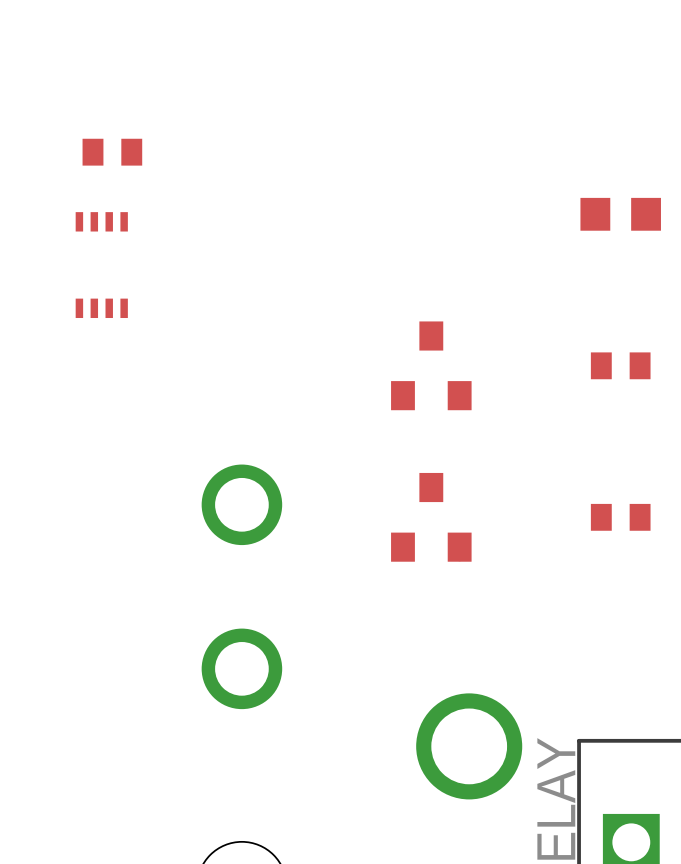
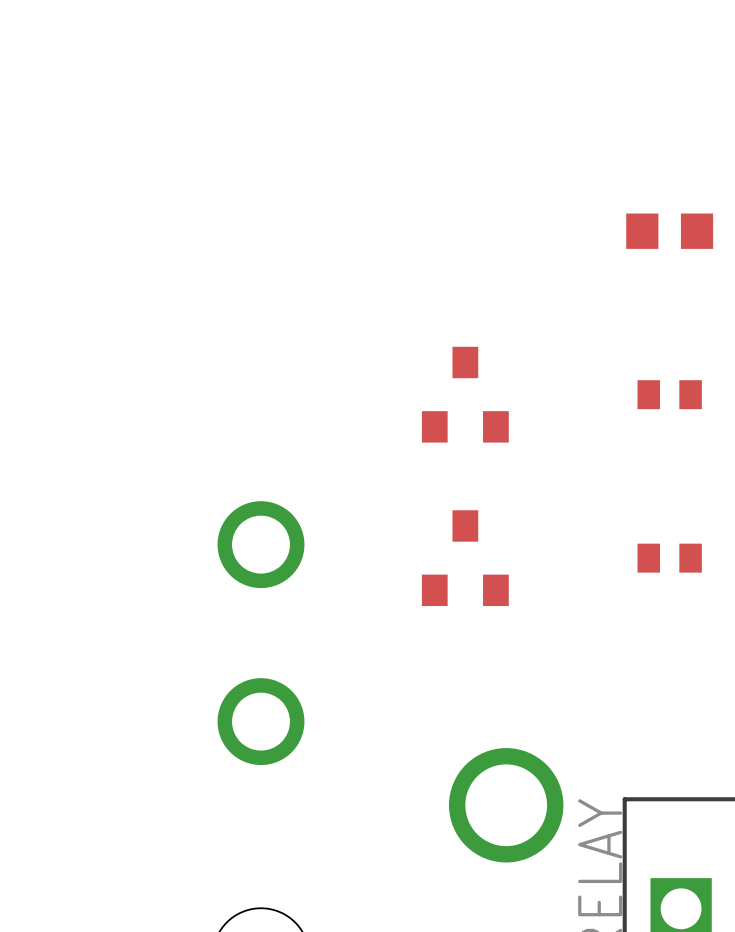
part: (112, 152) -> none
part: (101, 265) -> none

